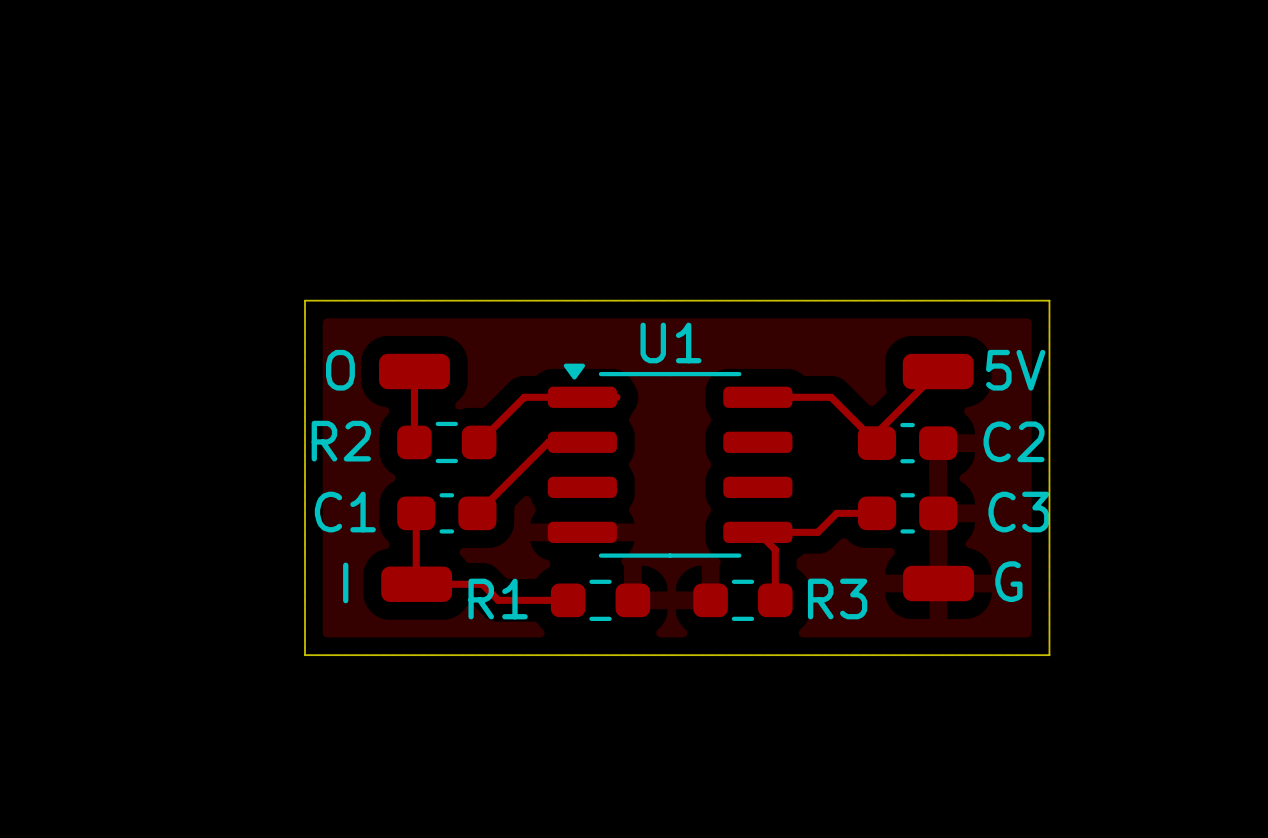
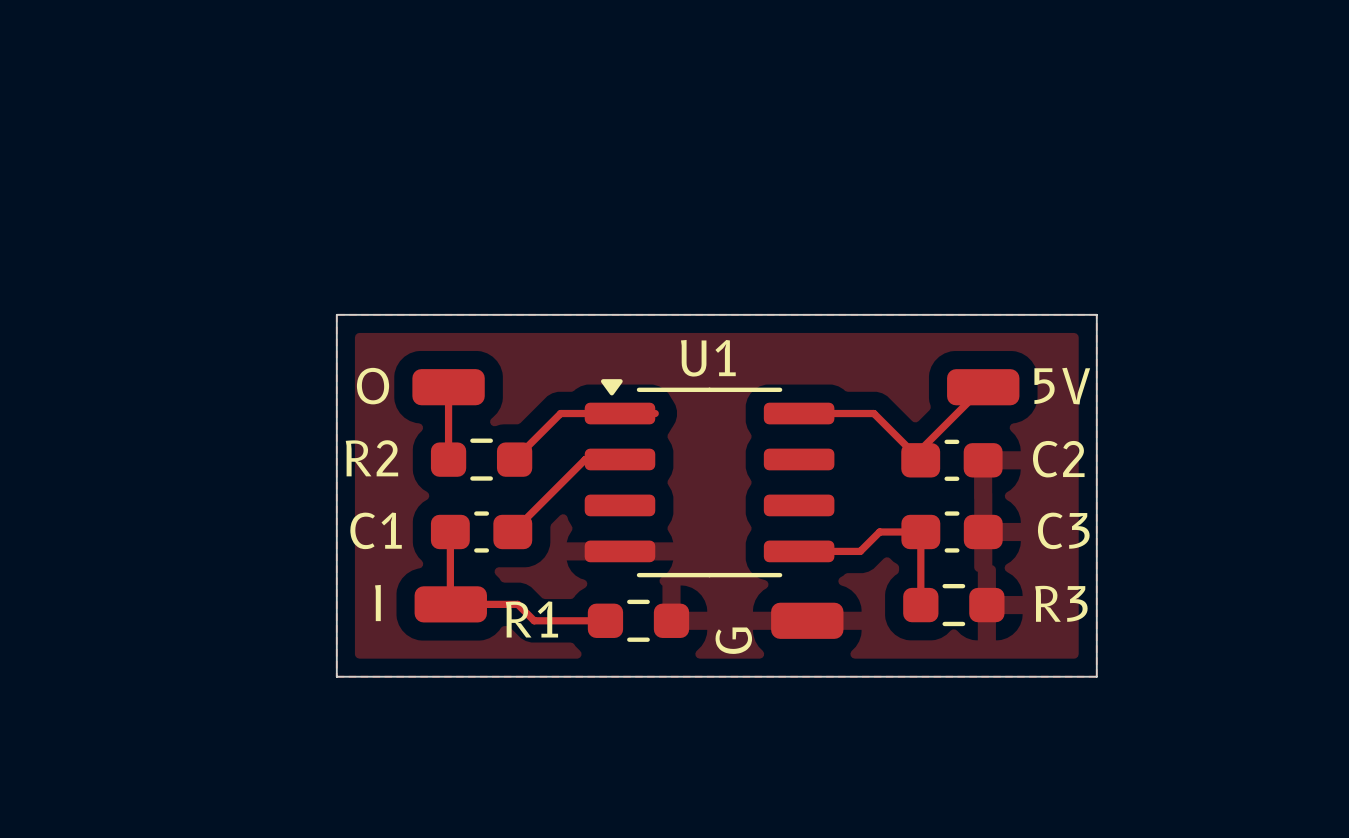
top track: none -> (920, 531) (920, 605)
top track: (757, 532) (775, 549) (775, 600) -> none
G name rotation: 0° (1008, 581) -> 90° counterclockwise (733, 640)
G name position: G (1008, 581) -> G (733, 640)
G position: (938, 583) -> (807, 620)
R3 name position: R3 (837, 598) -> R3 (1061, 603)
R3 position: (742, 600) -> (953, 605)

